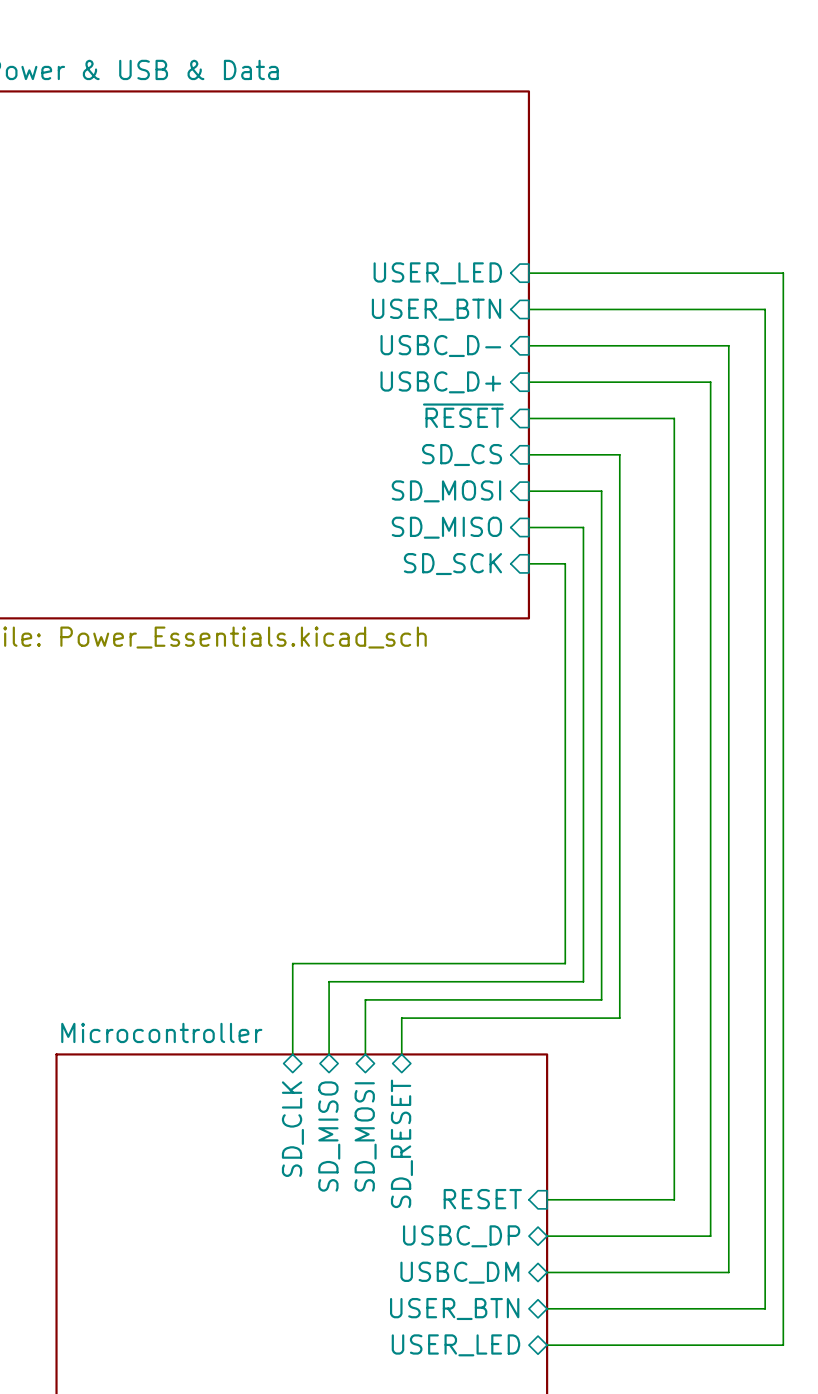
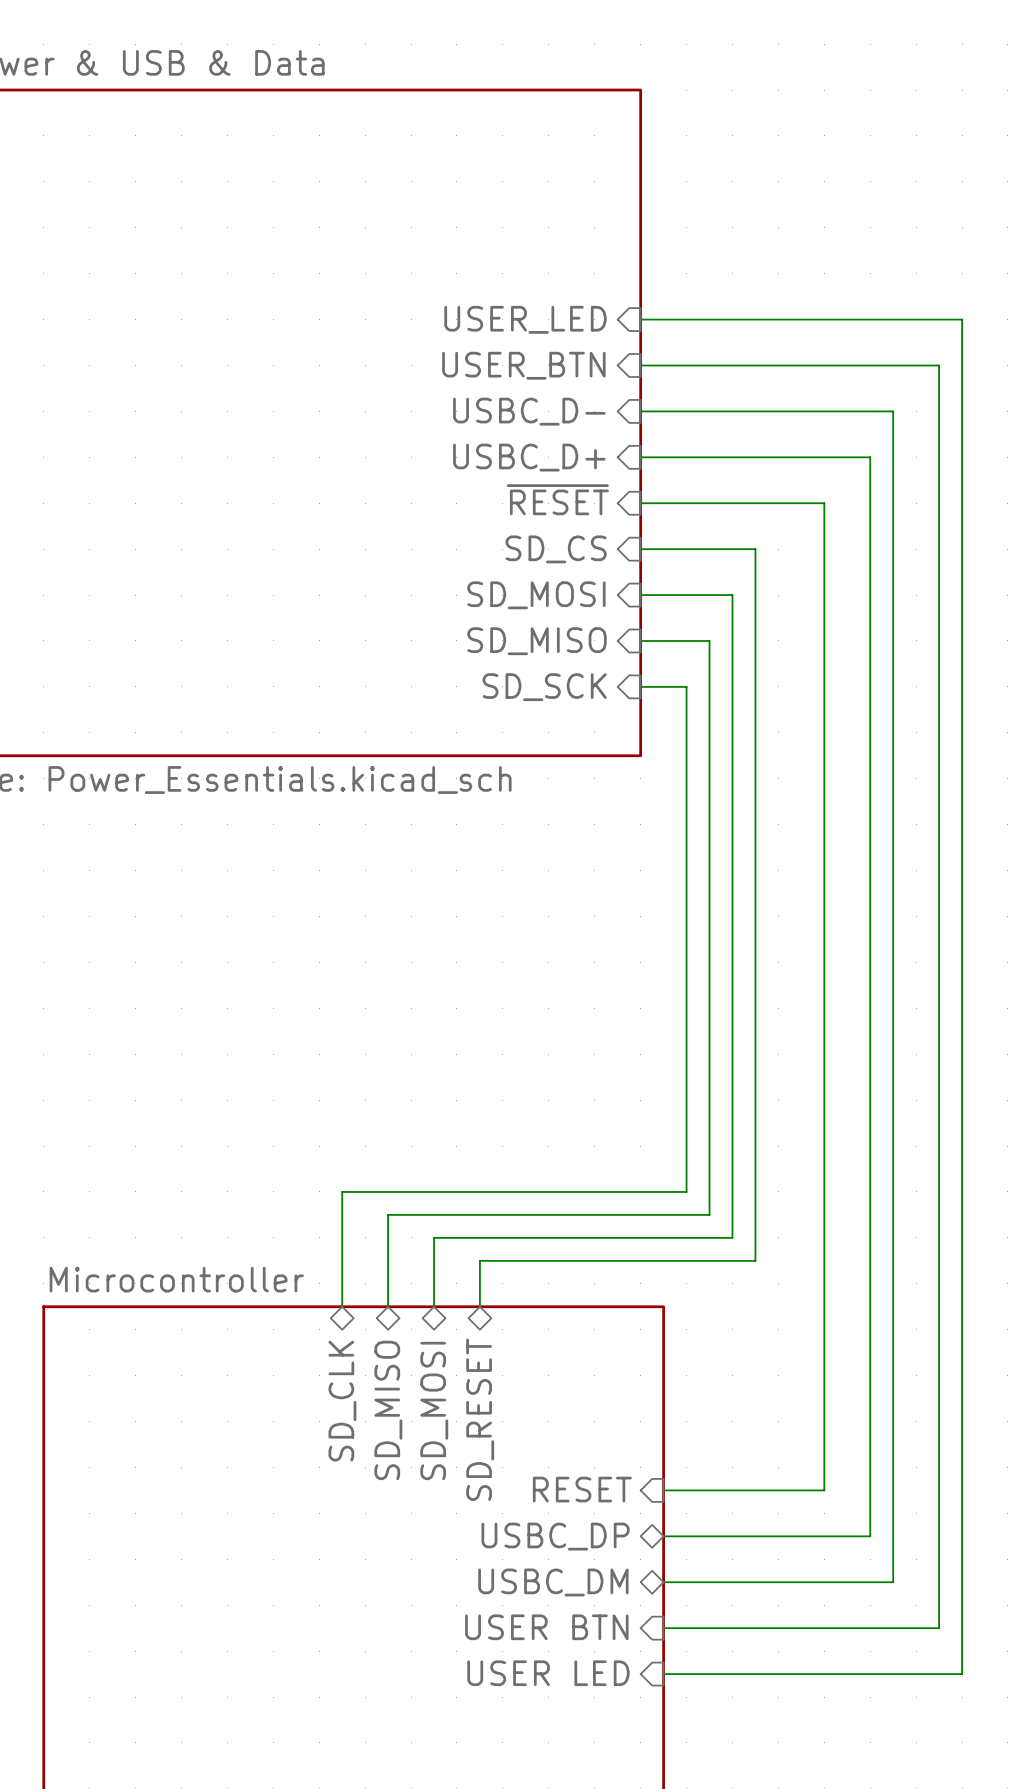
sheet pin shape: bidirectional (454, 1309) -> input (546, 1627)
sheet pin: USER_BTN (454, 1309) -> USER BTN (546, 1627)
sheet pin shape: bidirectional (455, 1345) -> input (548, 1673)
sheet pin: USER_LED (455, 1345) -> USER LED (548, 1673)

